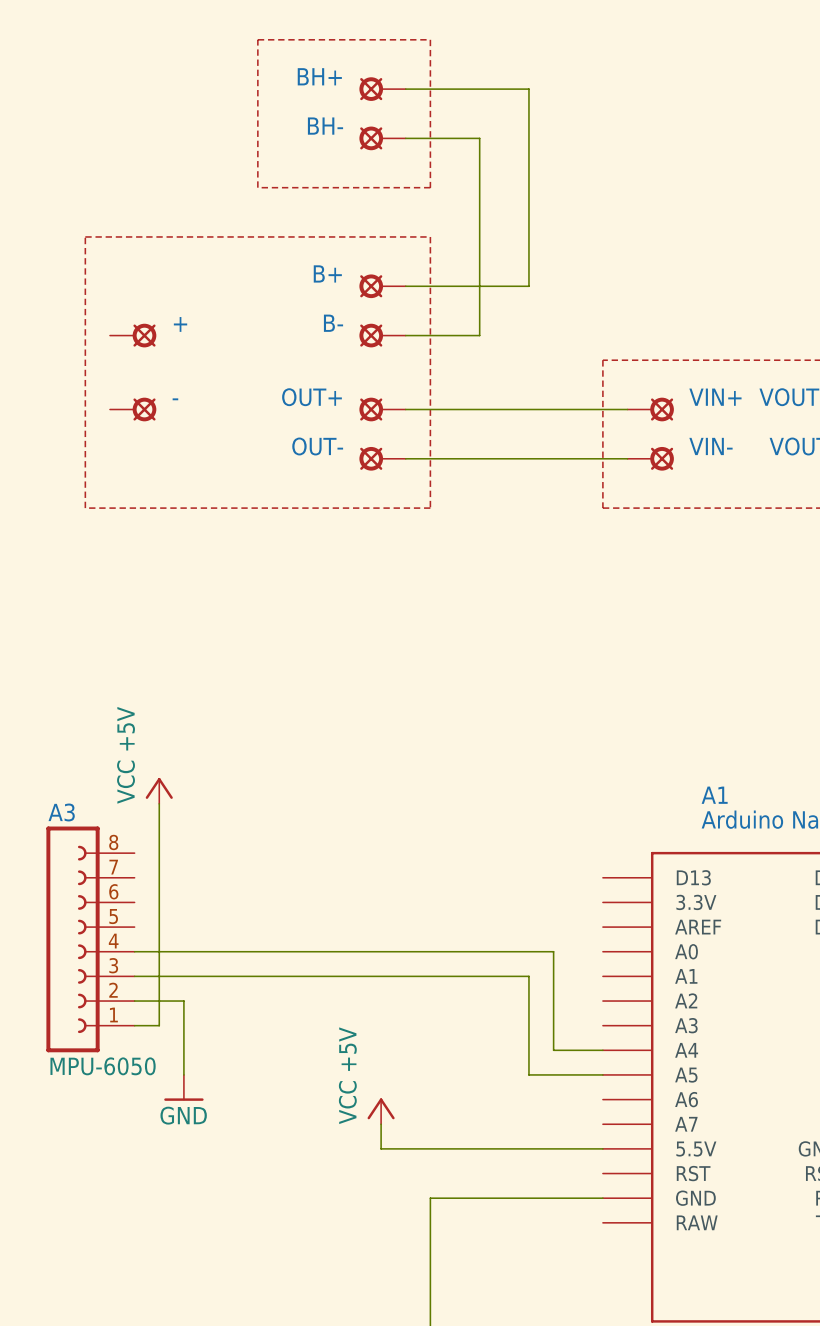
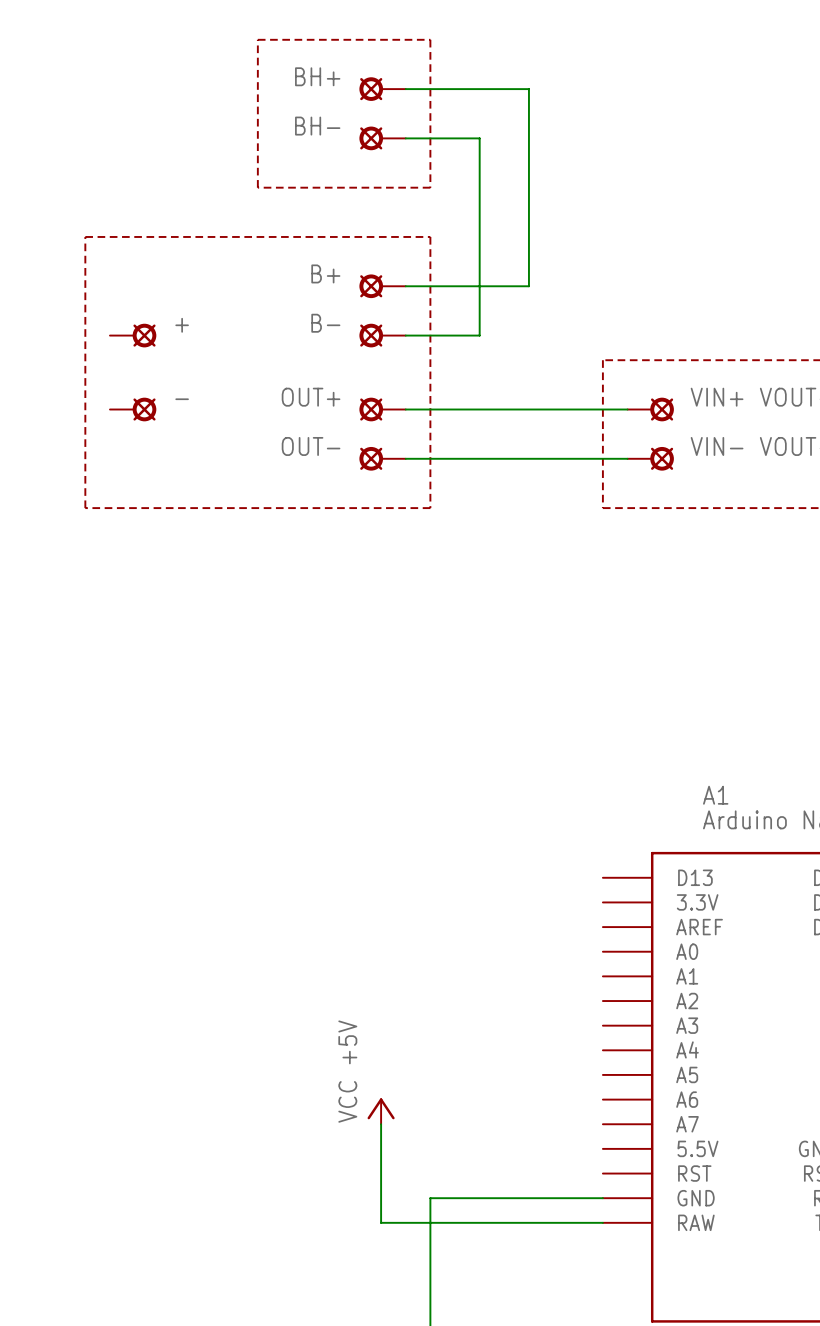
power symbol: VCC +5V (159, 790) -> none
wire: (159, 803) (159, 1025) (134, 1025) -> none
A3: MPU-6050 (90, 939) -> none
wire: (134, 951) (553, 951) (553, 1050) (602, 1050) -> none
wire: (134, 976) (528, 976) (528, 1074) (602, 1074) -> none
wire: (134, 1001) (183, 1001) (183, 1074) -> none
power symbol: GND (183, 1087) -> none
wire: (381, 1148) (602, 1148) -> (381, 1148) (381, 1222) (602, 1222)

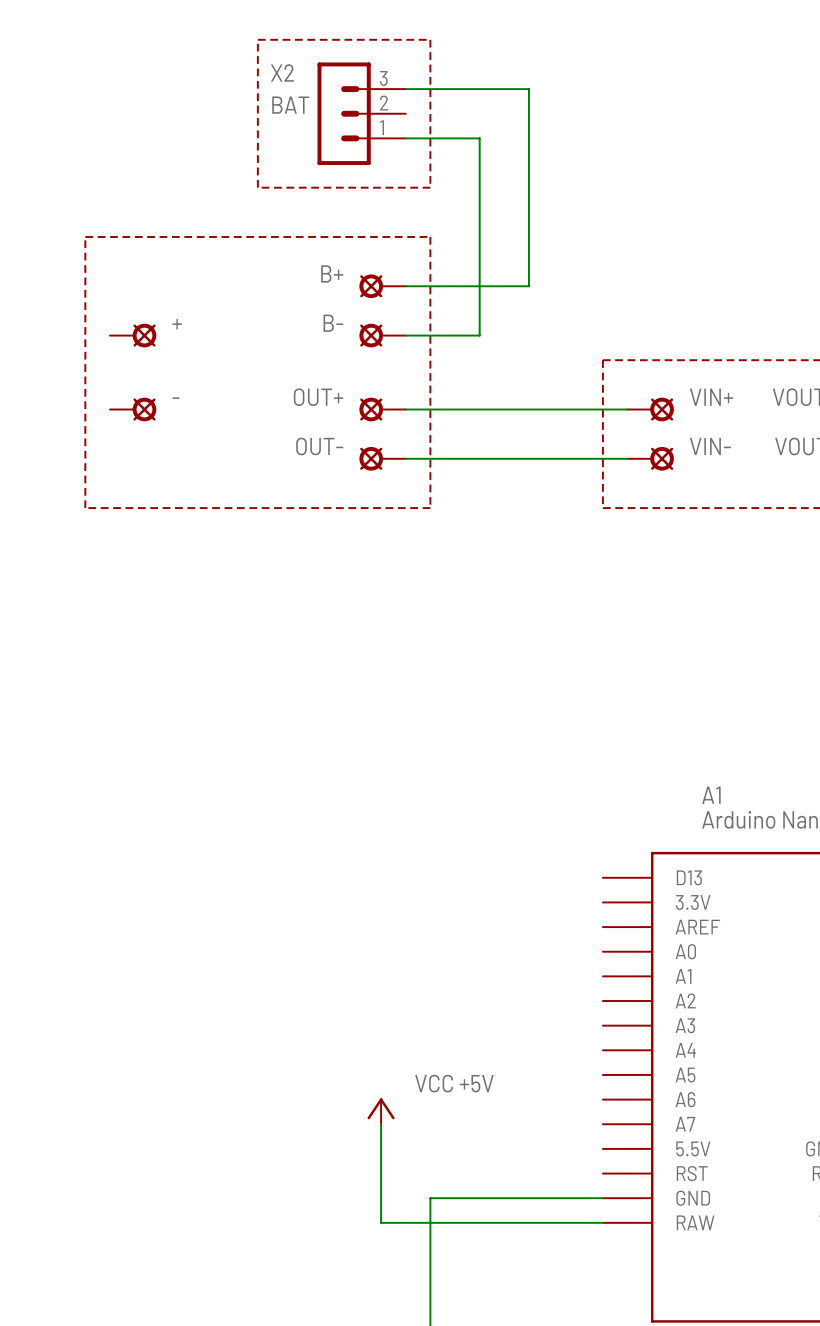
BH+: (382, 89) -> none
X2: none -> BAT (361, 113)
BH-: (382, 138) -> none
power symbol text rotation: 0° (347, 1071) -> 90° clockwise (454, 1083)

